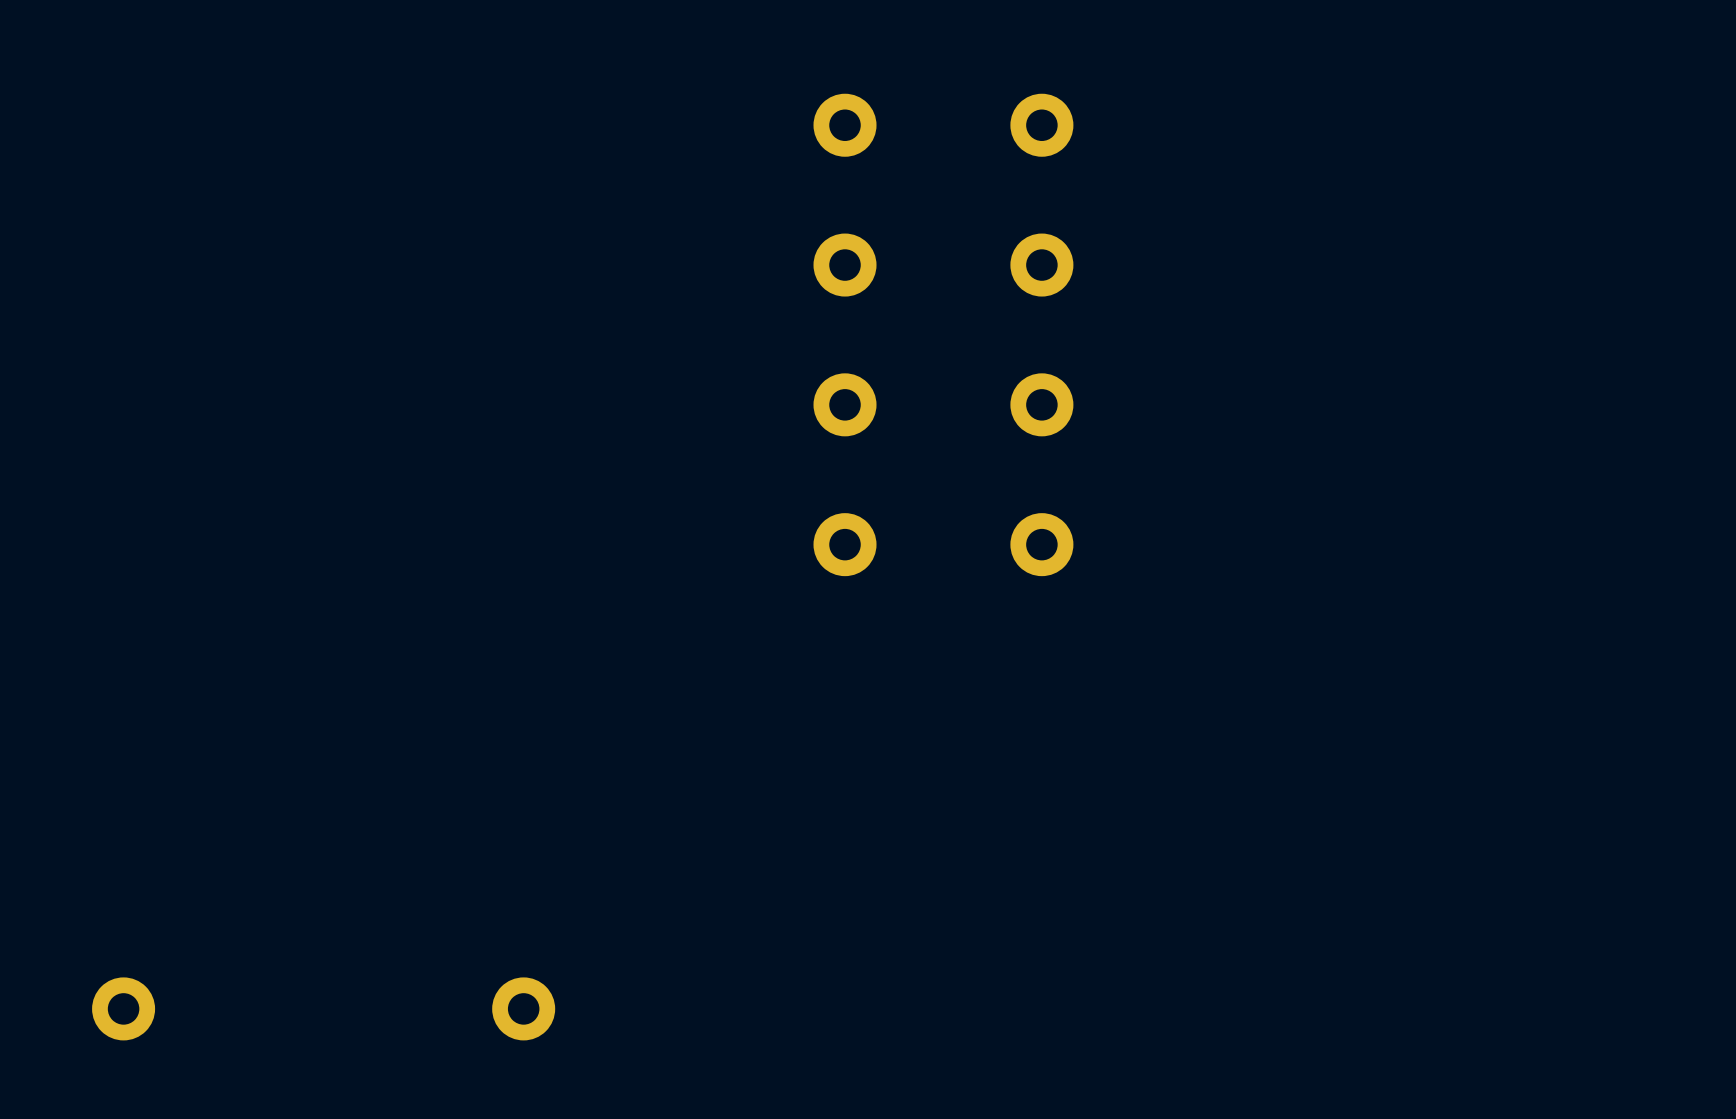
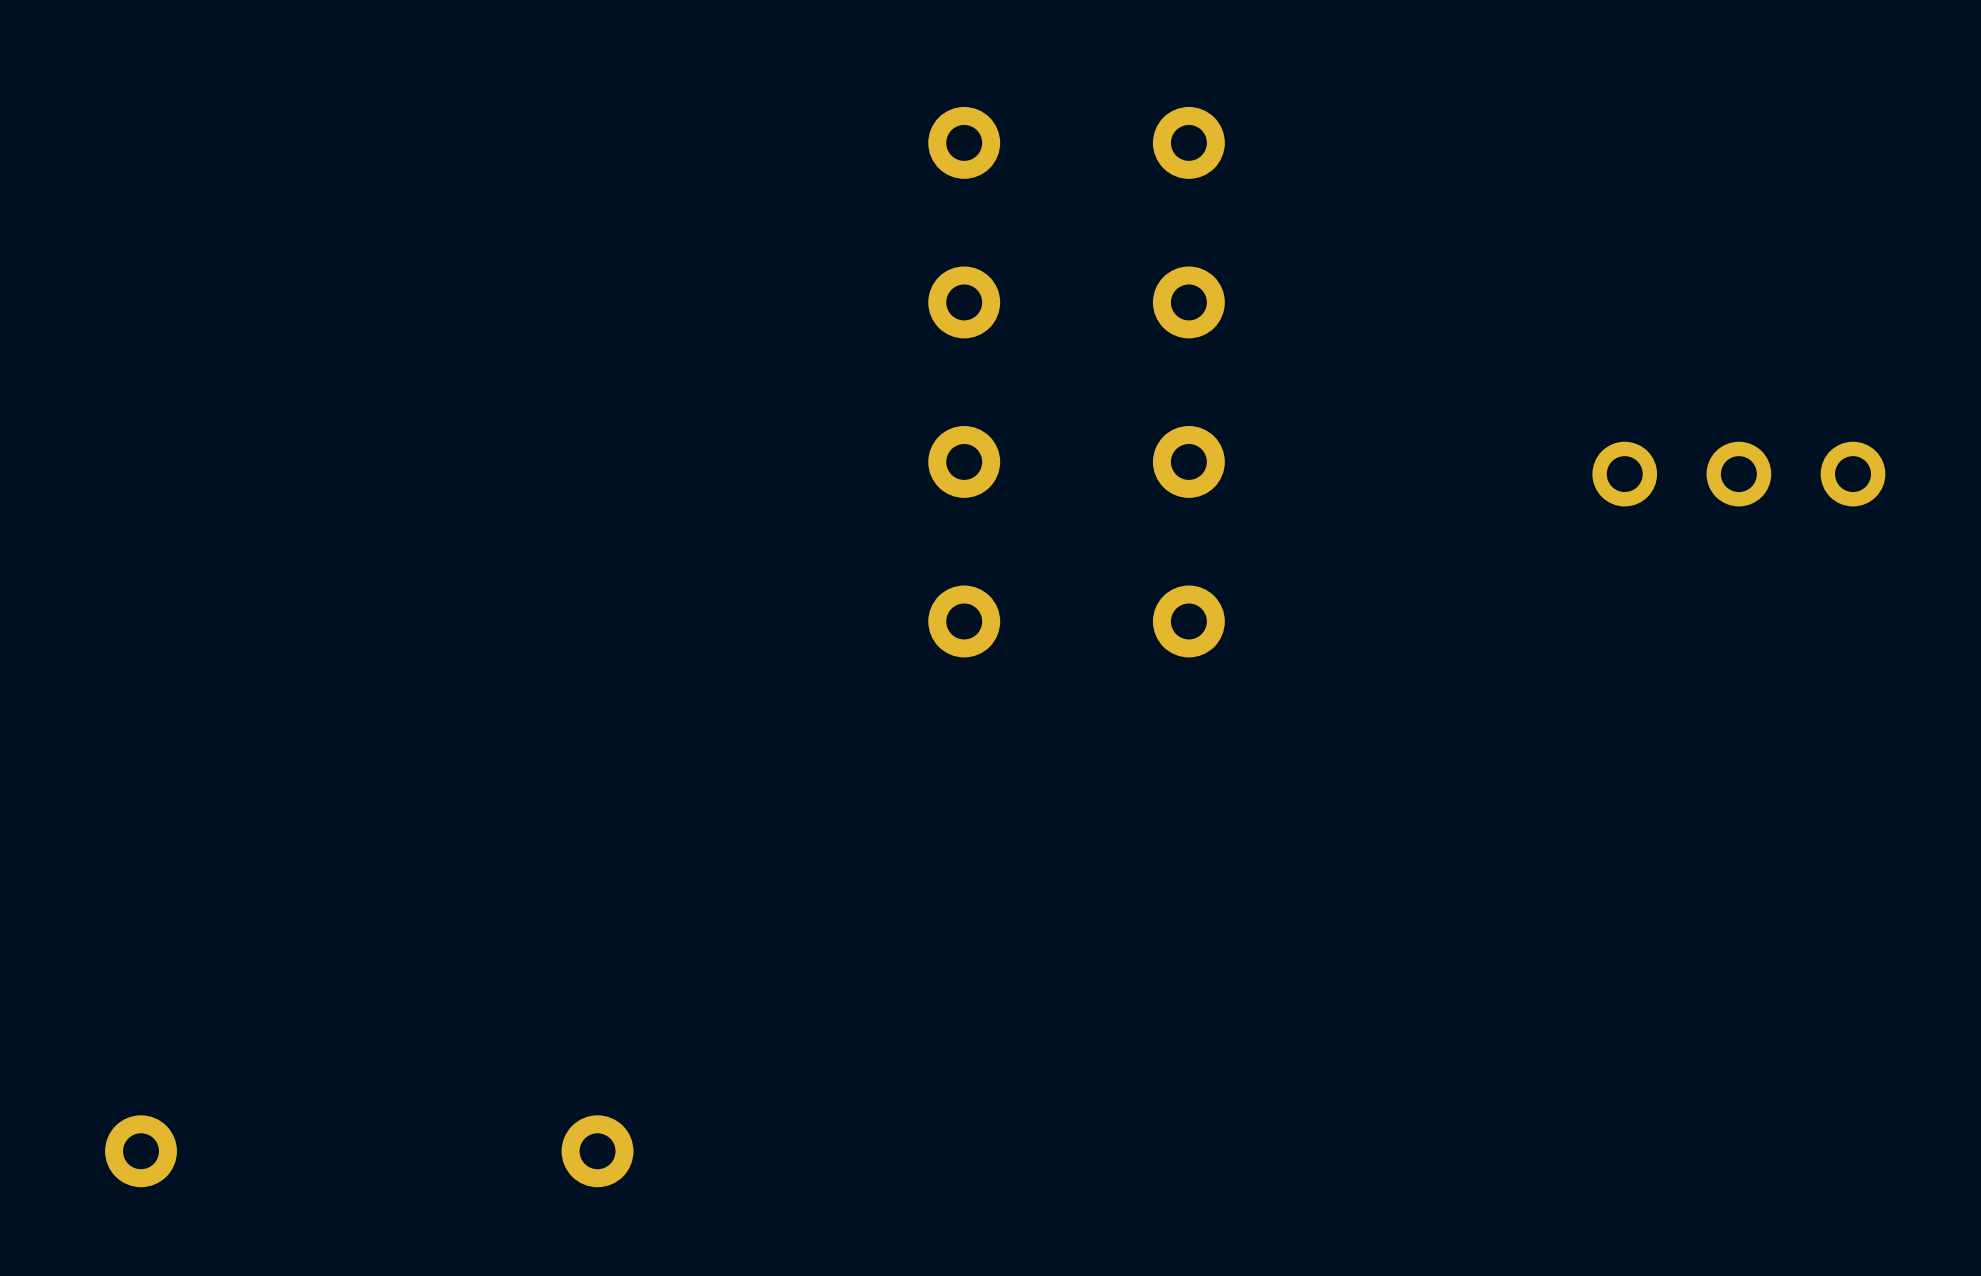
part: none -> (1738, 474)

